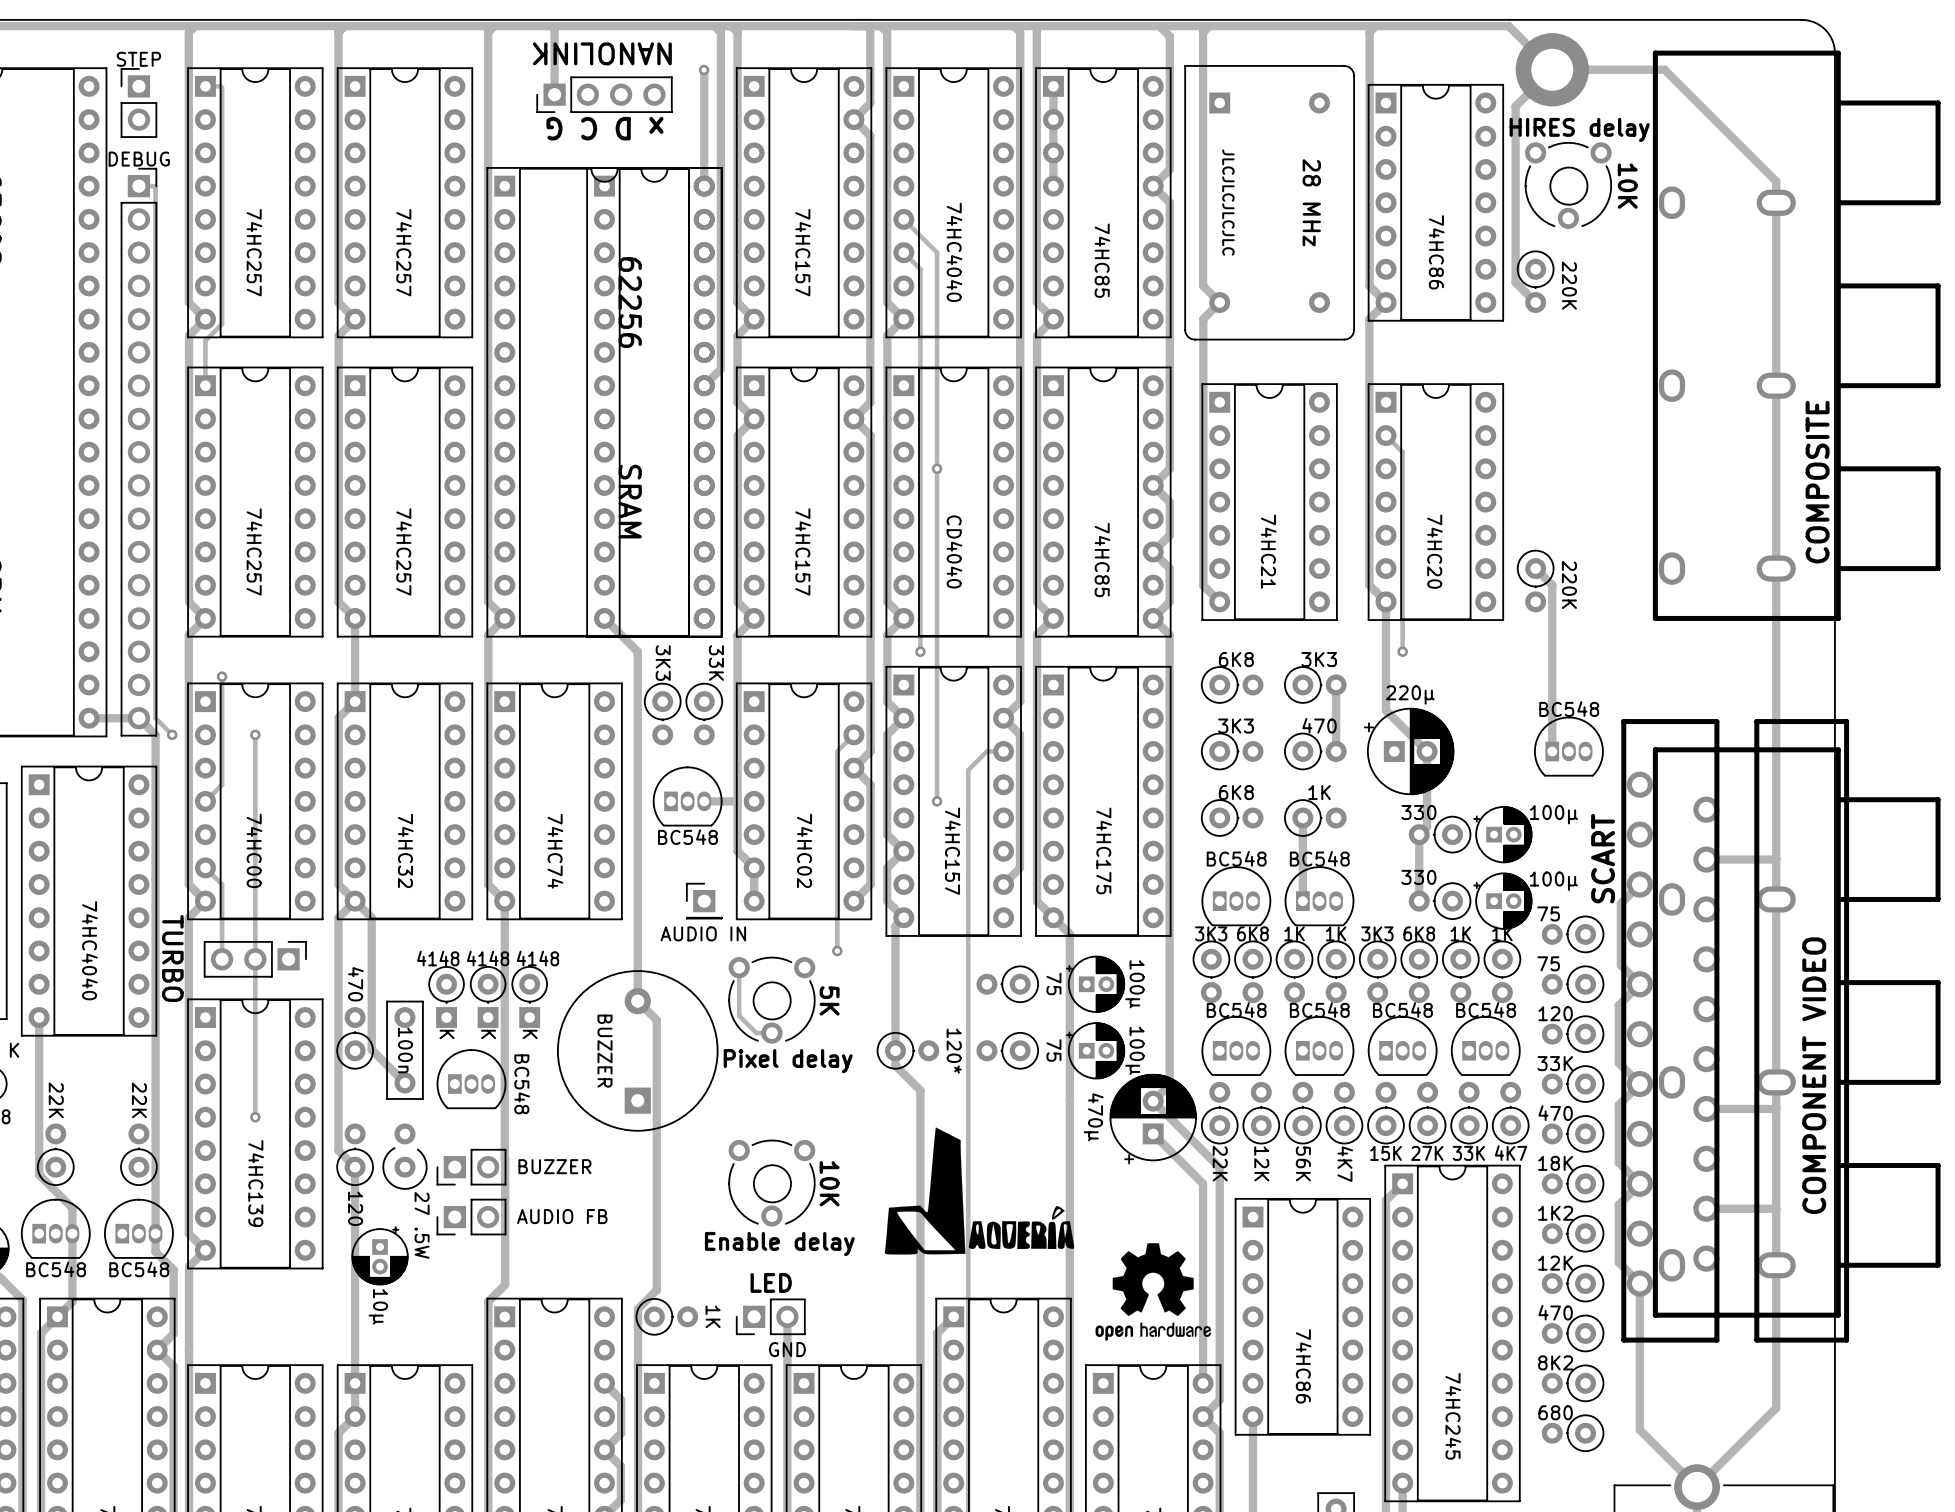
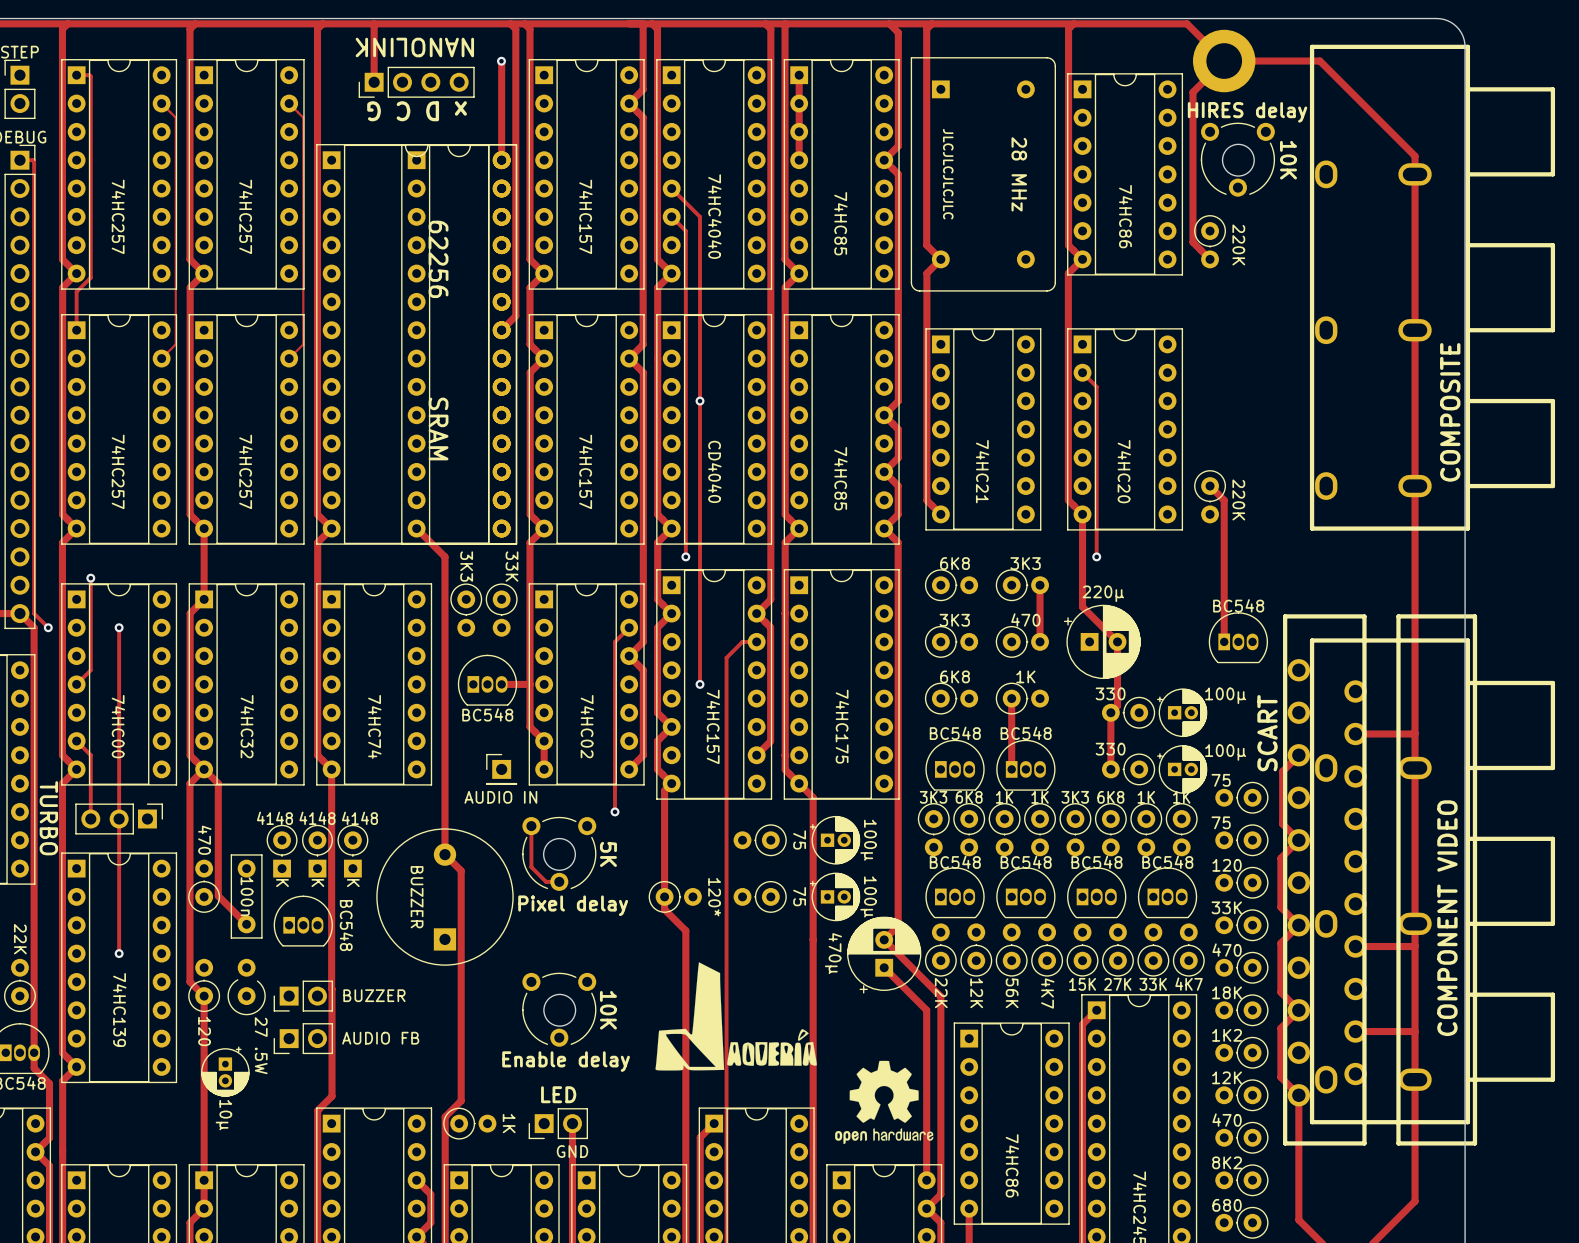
track: none -> (161, 103) (175, 117) (175, 344) (161, 358)
track: none -> (289, 103) (303, 117) (303, 344) (289, 358)

